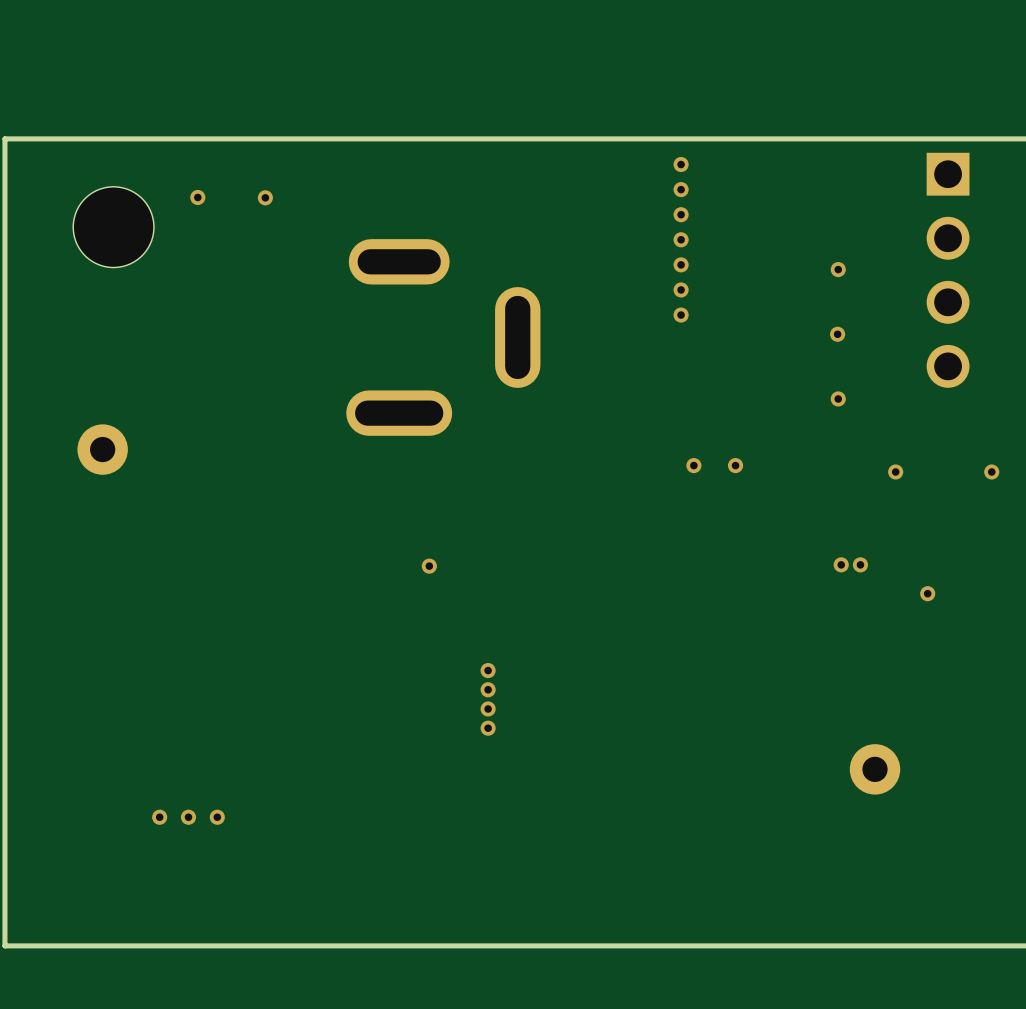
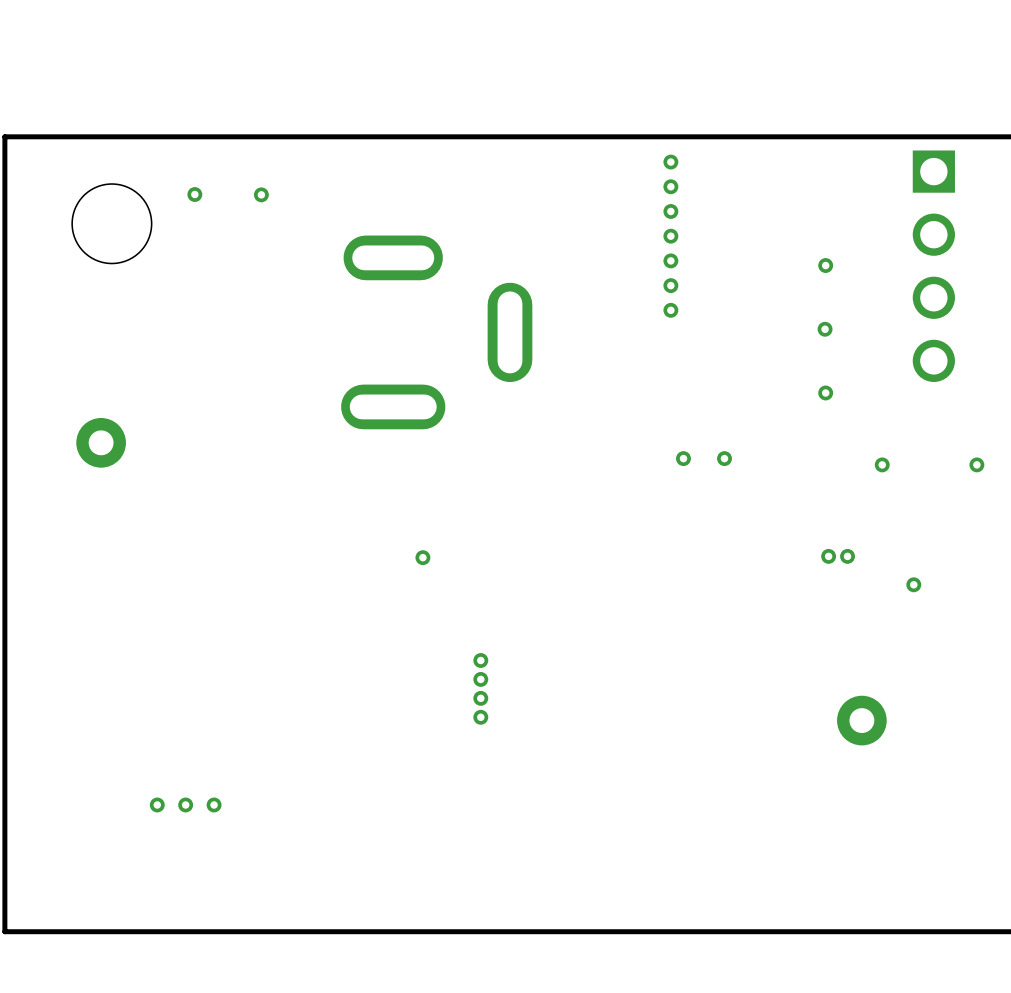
part position: (875, 769) -> (861, 720)

